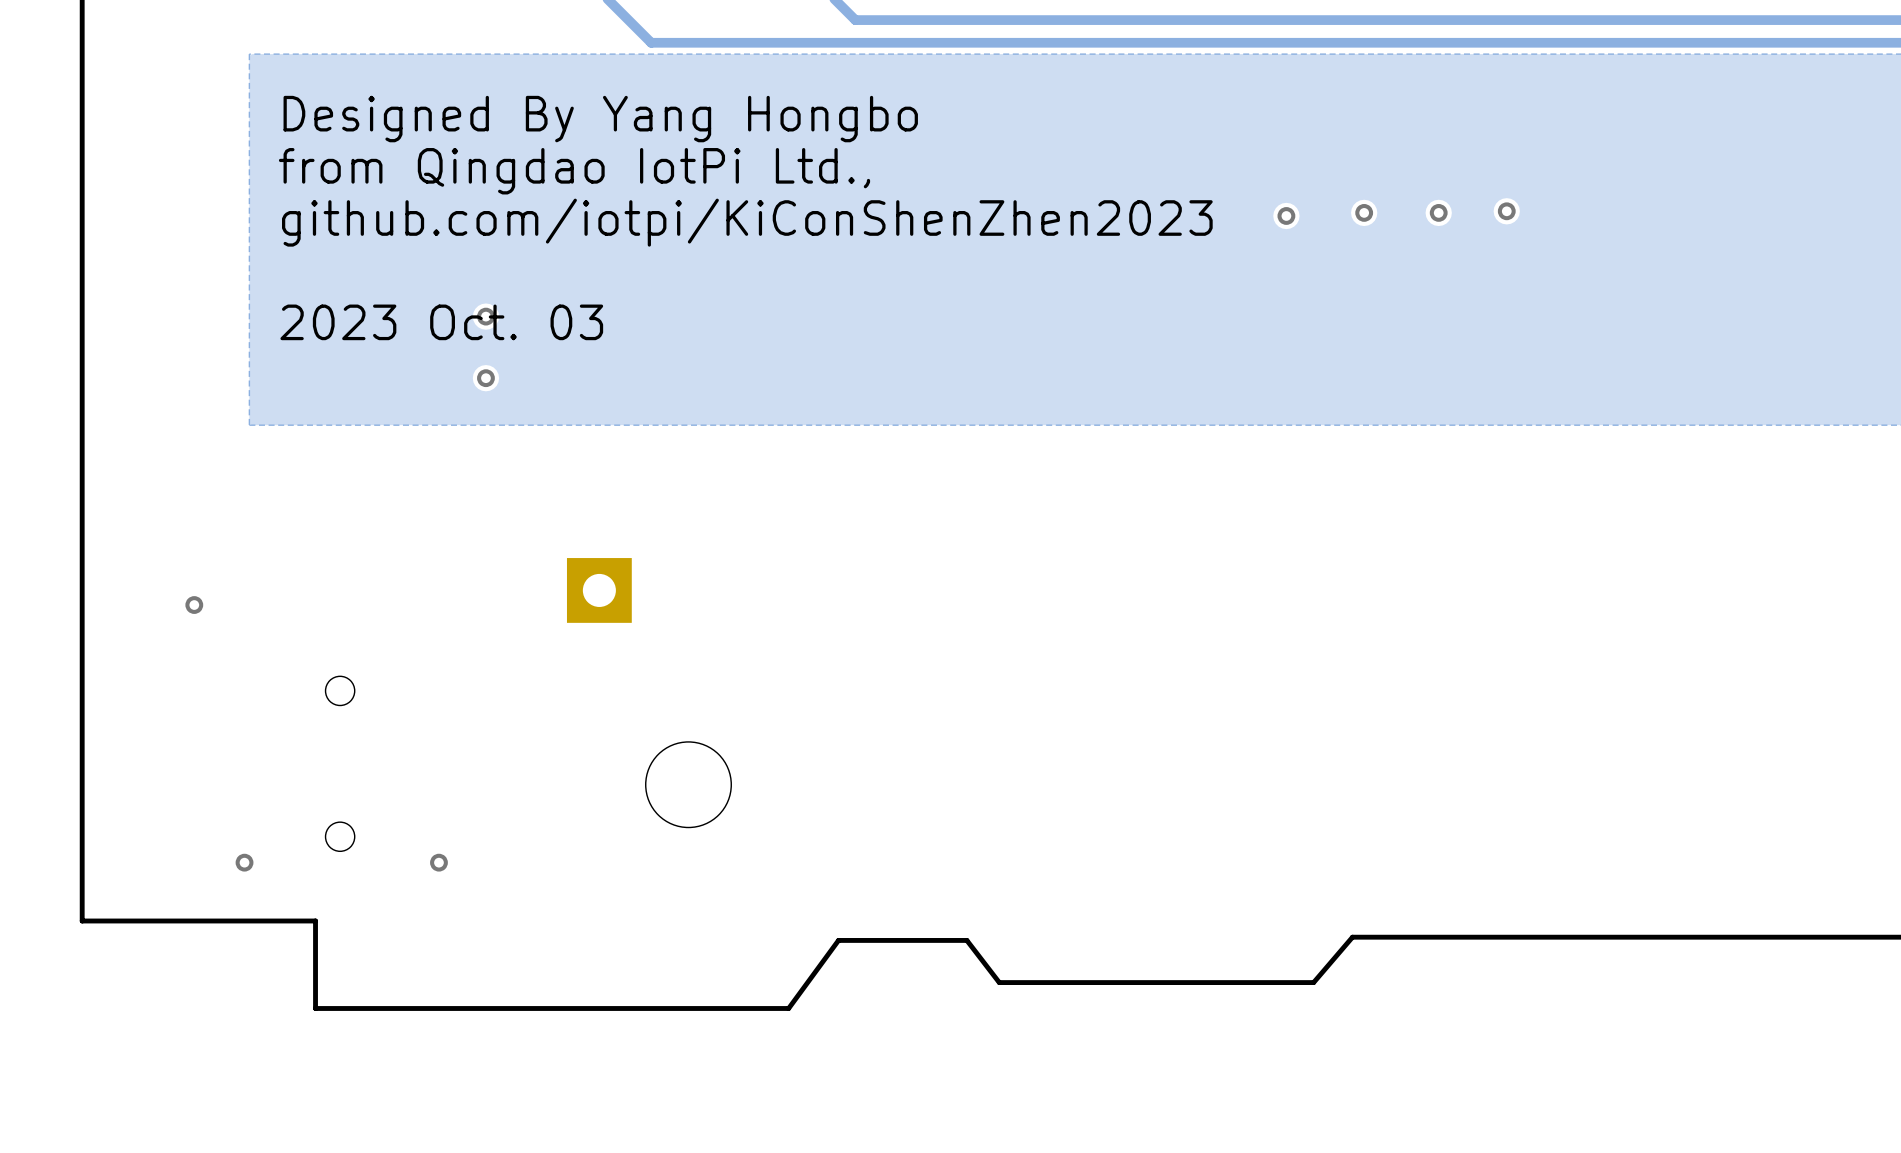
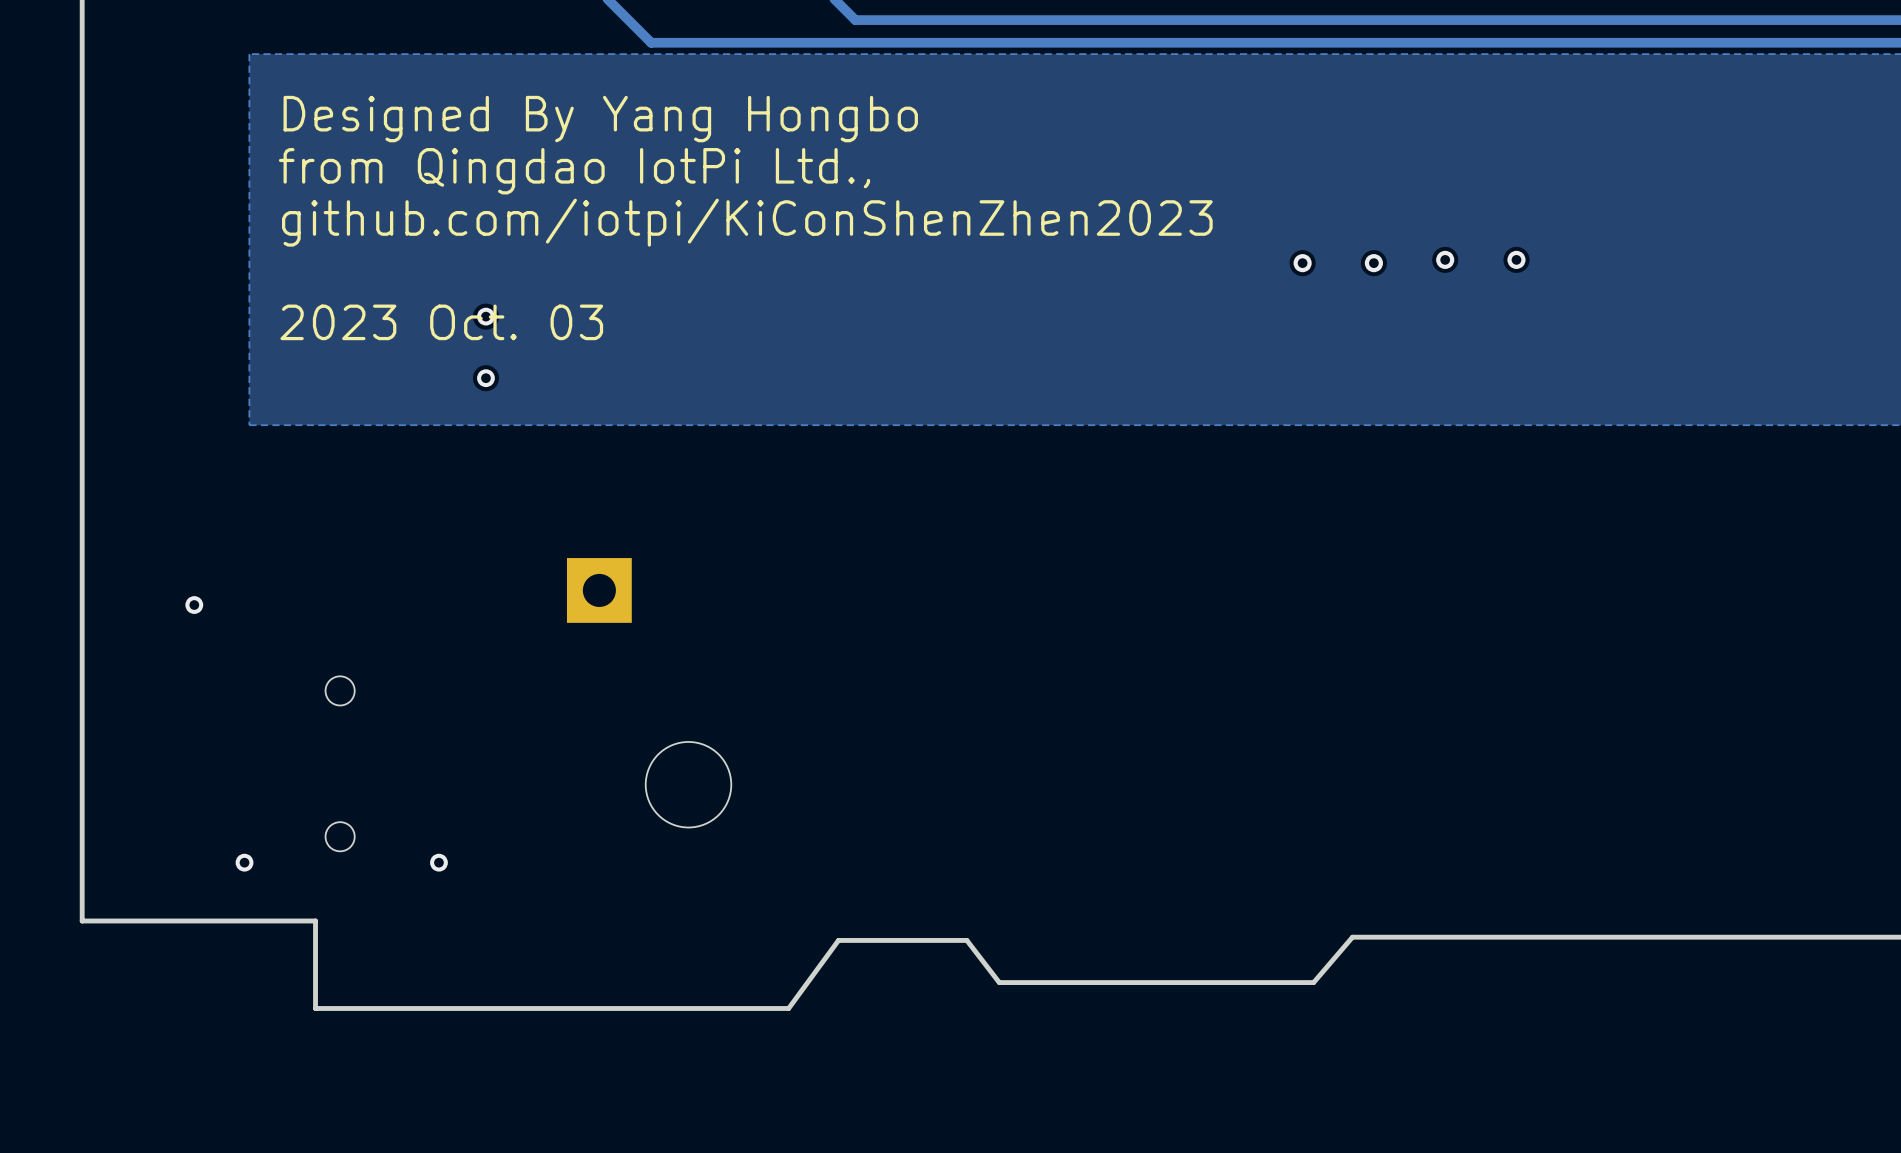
via: (1506, 211) -> none
via: (1364, 212) -> none
via: (1438, 212) -> none
via: (1286, 215) -> none
via: none -> (1445, 259)
via: none -> (1516, 259)
via: none -> (1302, 263)
via: none -> (1373, 263)

